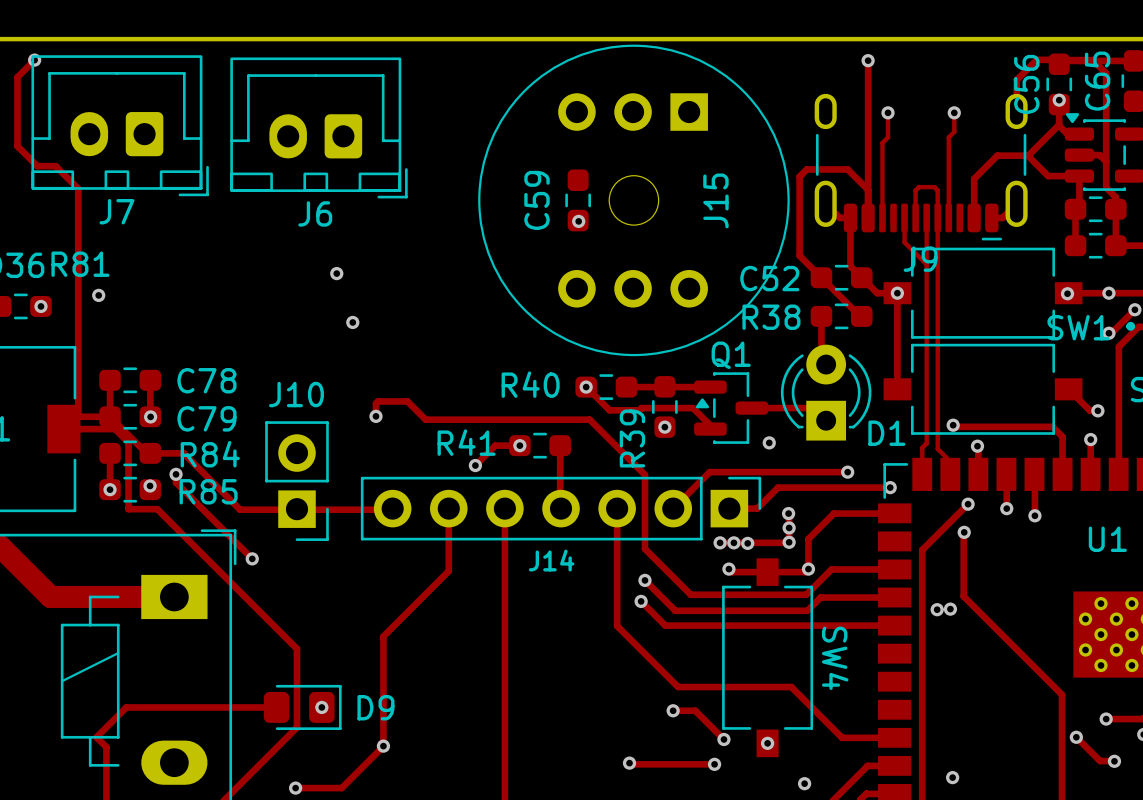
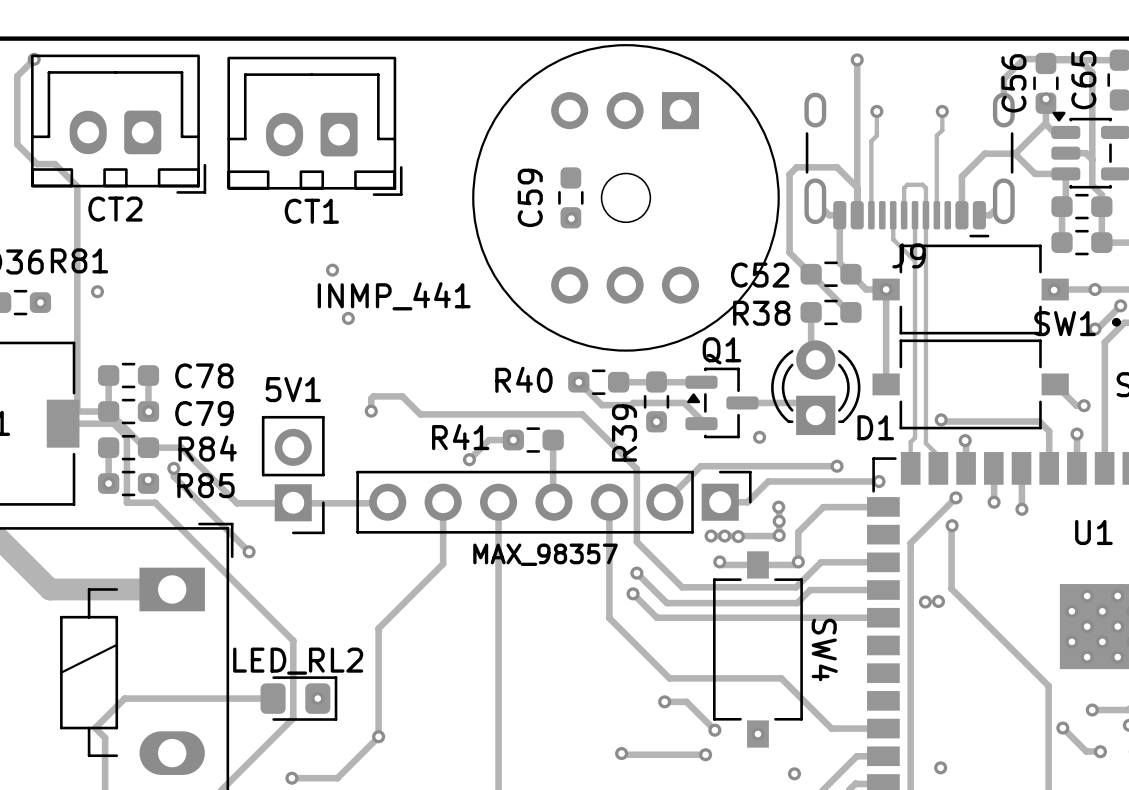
J15 name: J15 (715, 200) -> INMP_441 (394, 296)
J7 name: J7 (116, 211) -> CT2 (115, 209)
J6 name: J6 (315, 213) -> CT1 (311, 211)
J10 name: J10 (296, 394) -> 5V1 (293, 389)
J14 name: J14 (551, 560) -> MAX_98357 (545, 554)
D9 name: D9 (375, 707) -> LED_RL2 (298, 661)

